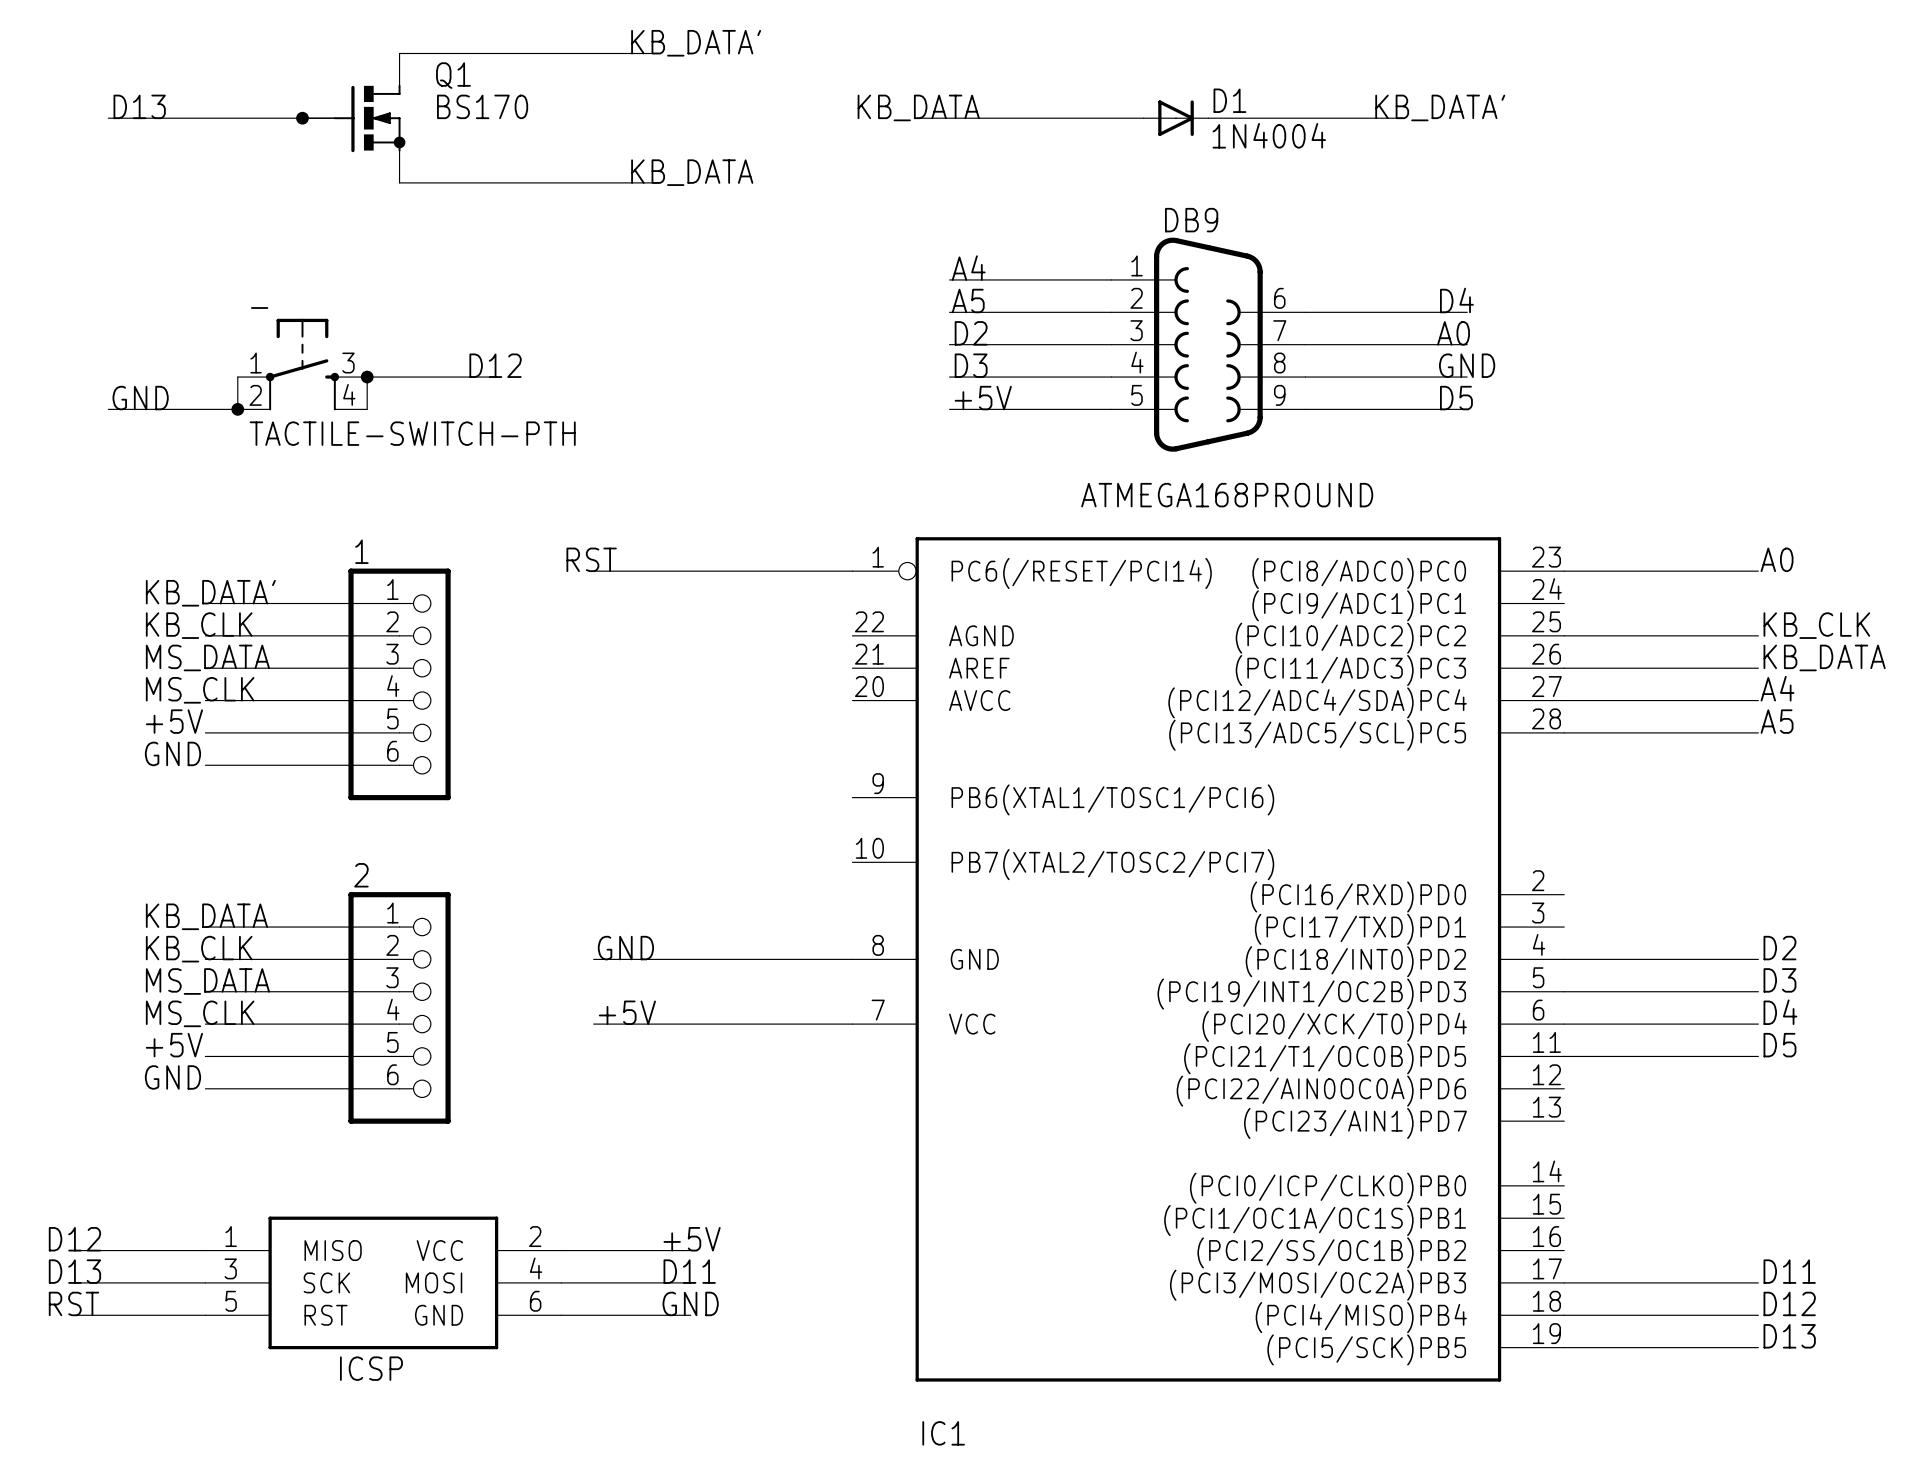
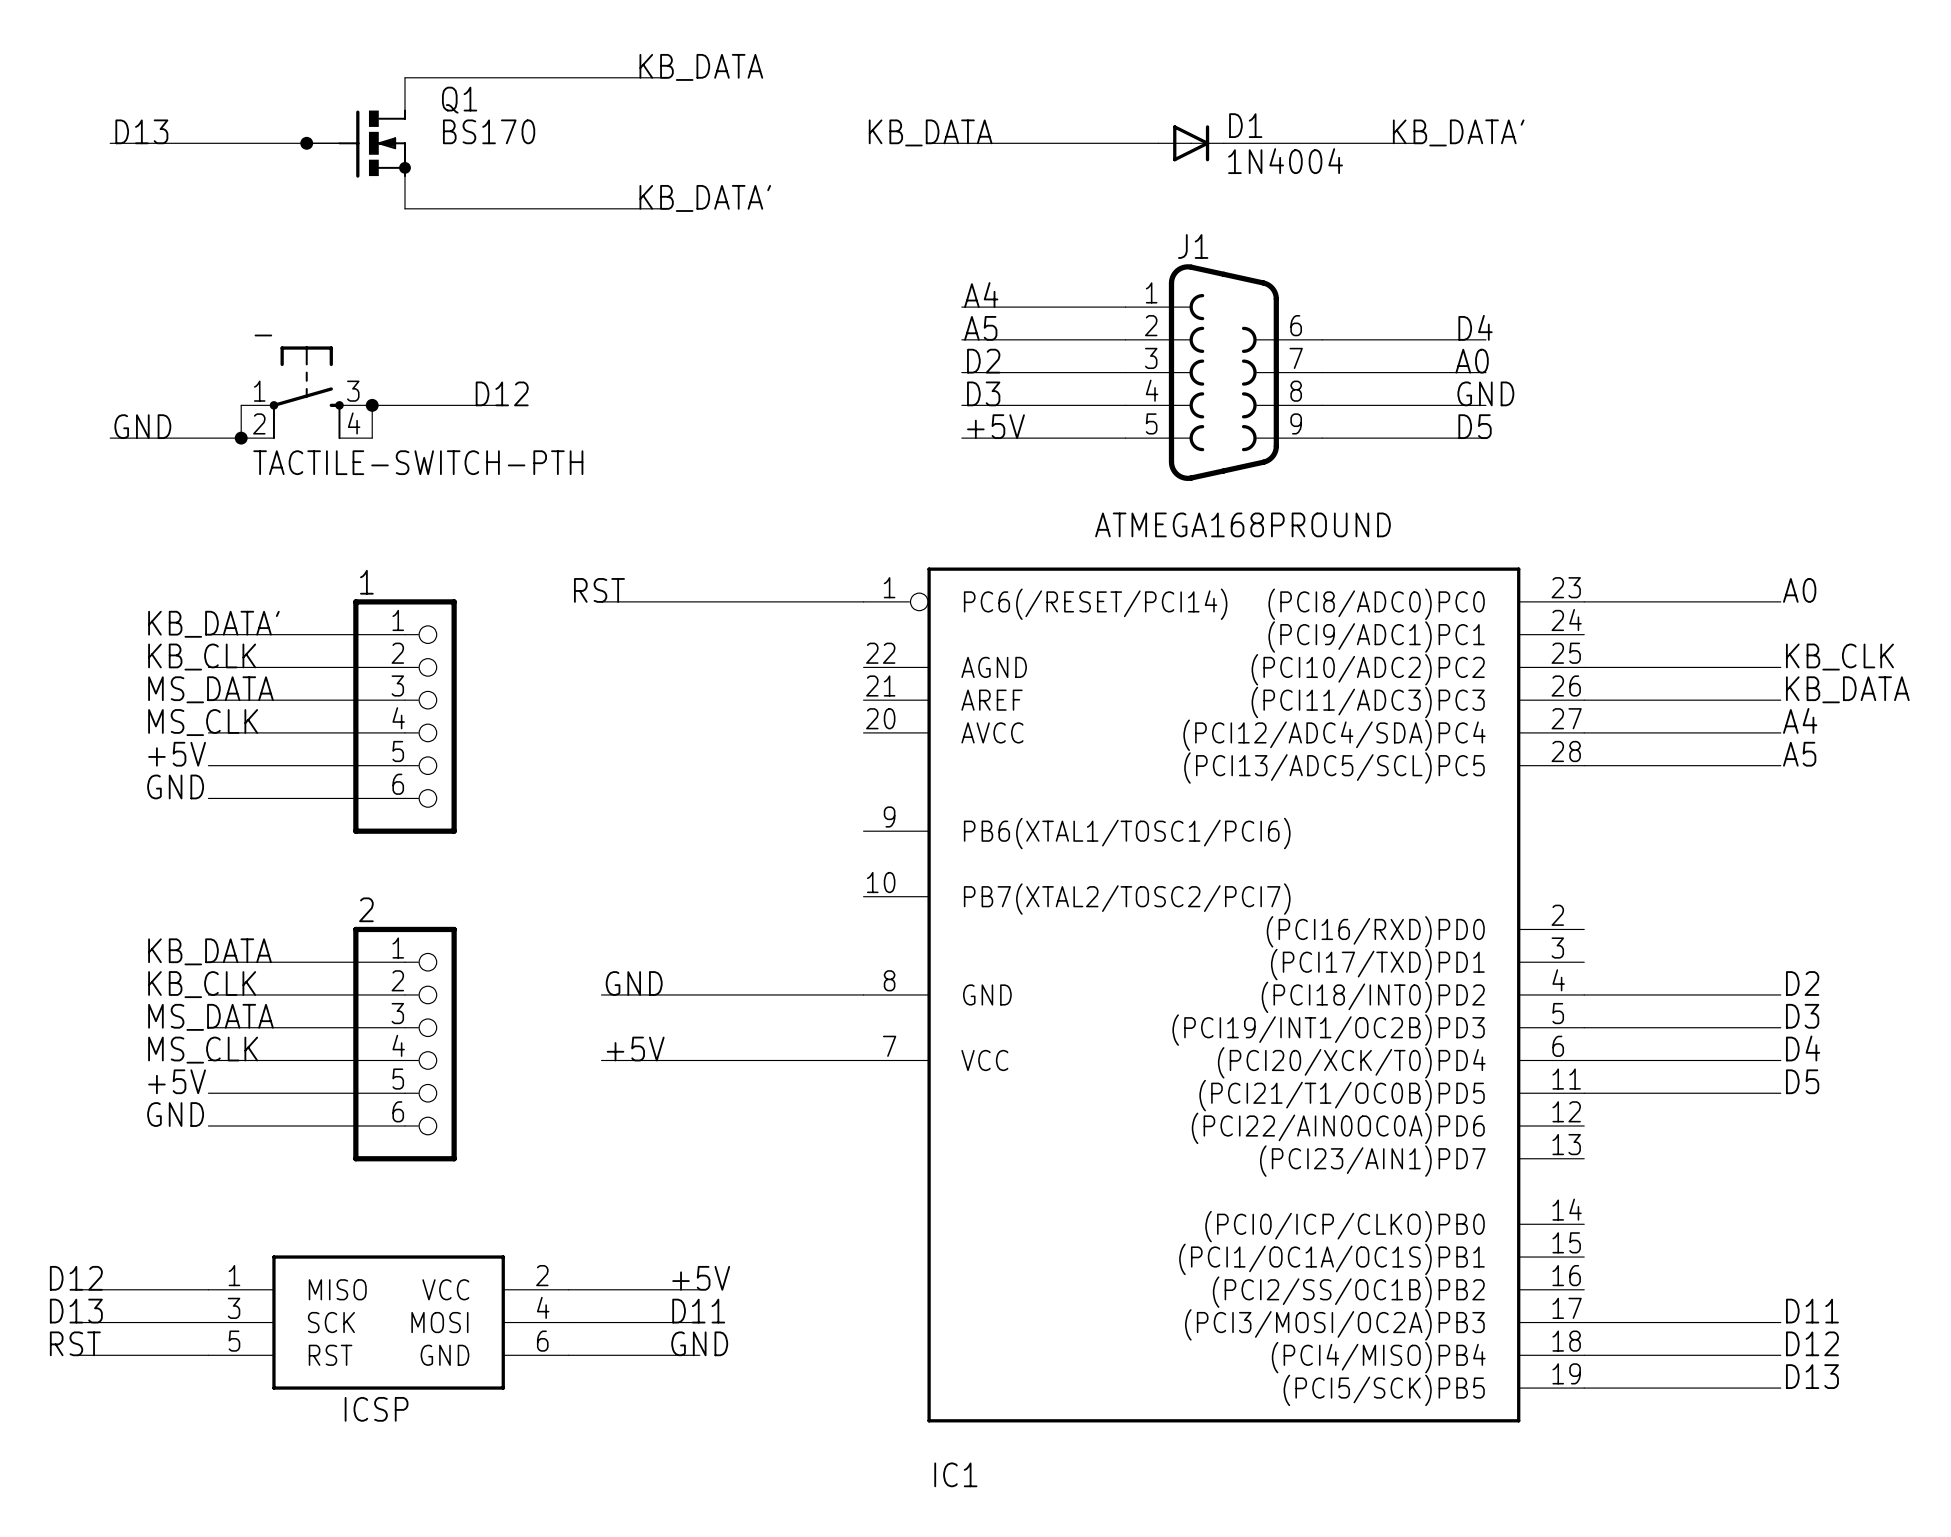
label: KB_DATA' (696, 43) -> KB_DATA (701, 67)
label: KB_DATA (692, 172) -> KB_DATA' (705, 198)
DB9 name: DB9 (1191, 220) -> J1 (1193, 246)

